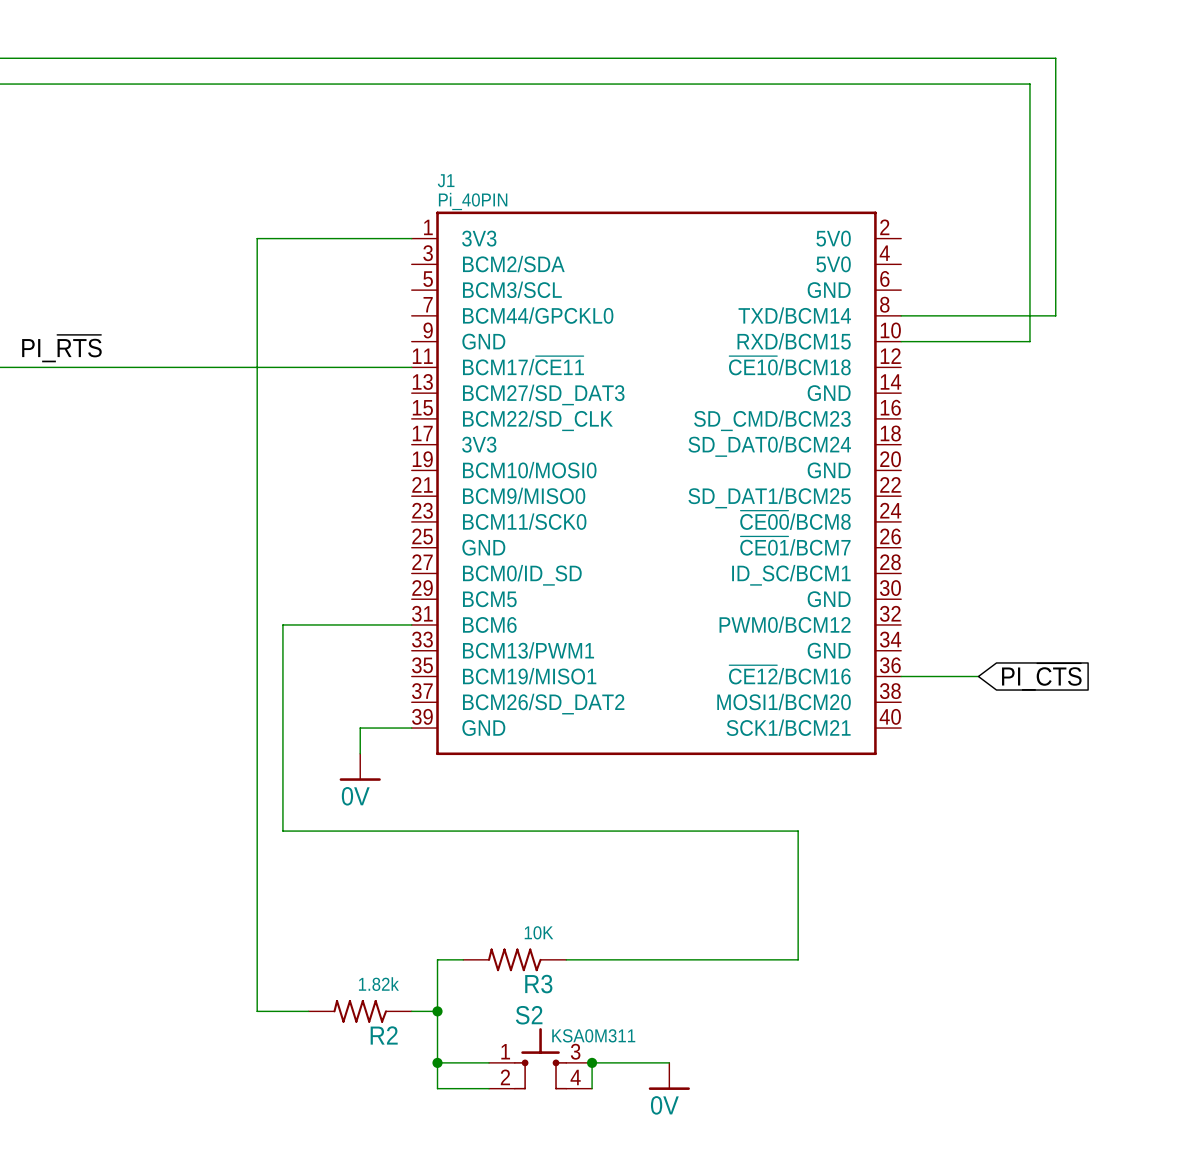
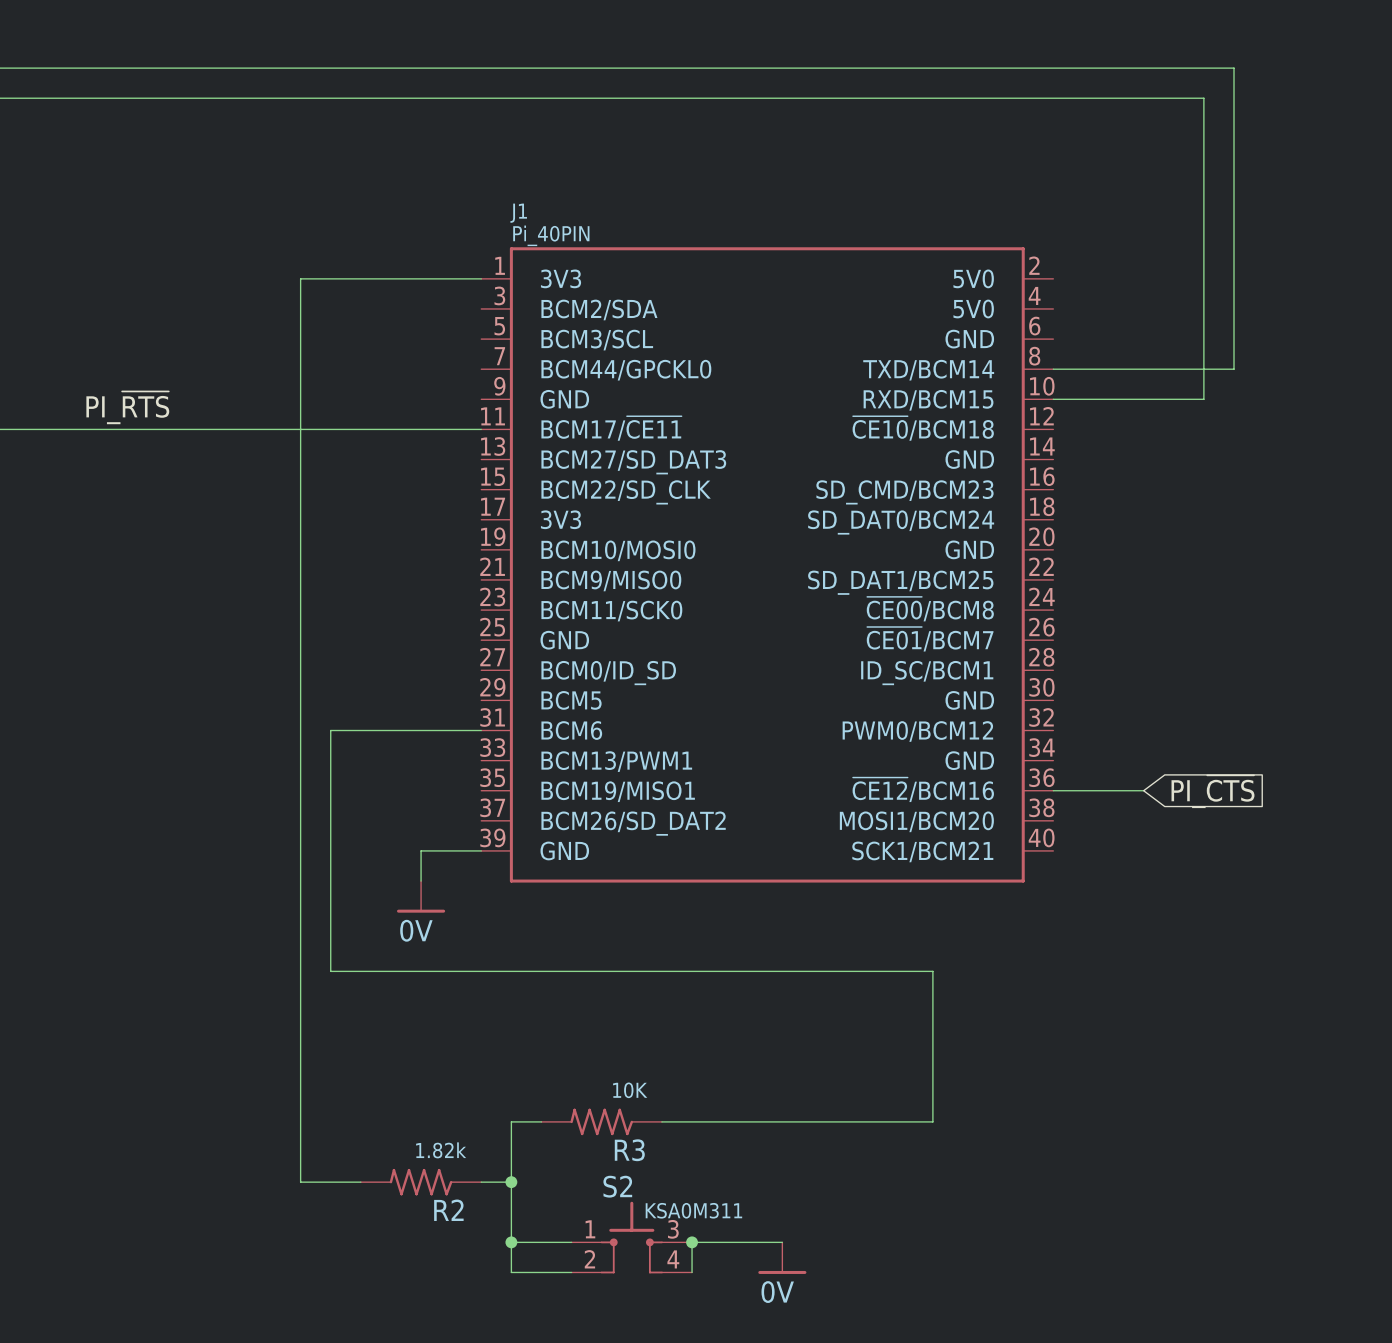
label position: PI_~{RTS} (61, 348) -> PI_~{RTS} (127, 407)

